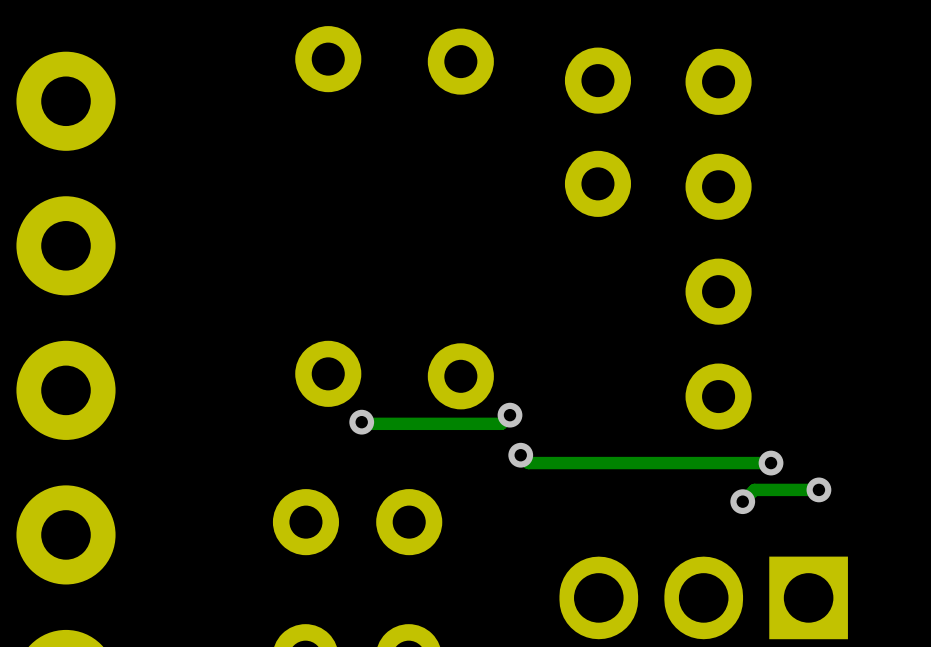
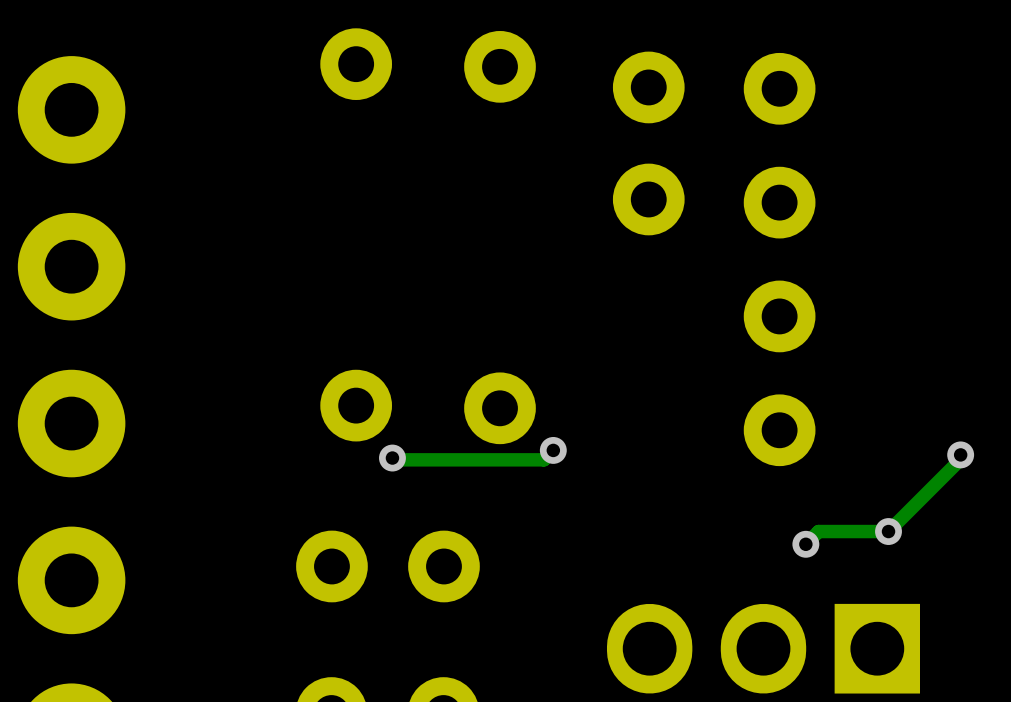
track: none -> (960, 454) (960, 459) (888, 531)
track: (520, 455) (528, 463) (771, 463) -> none
via: (520, 455) -> none
via position: (771, 463) -> (960, 454)

